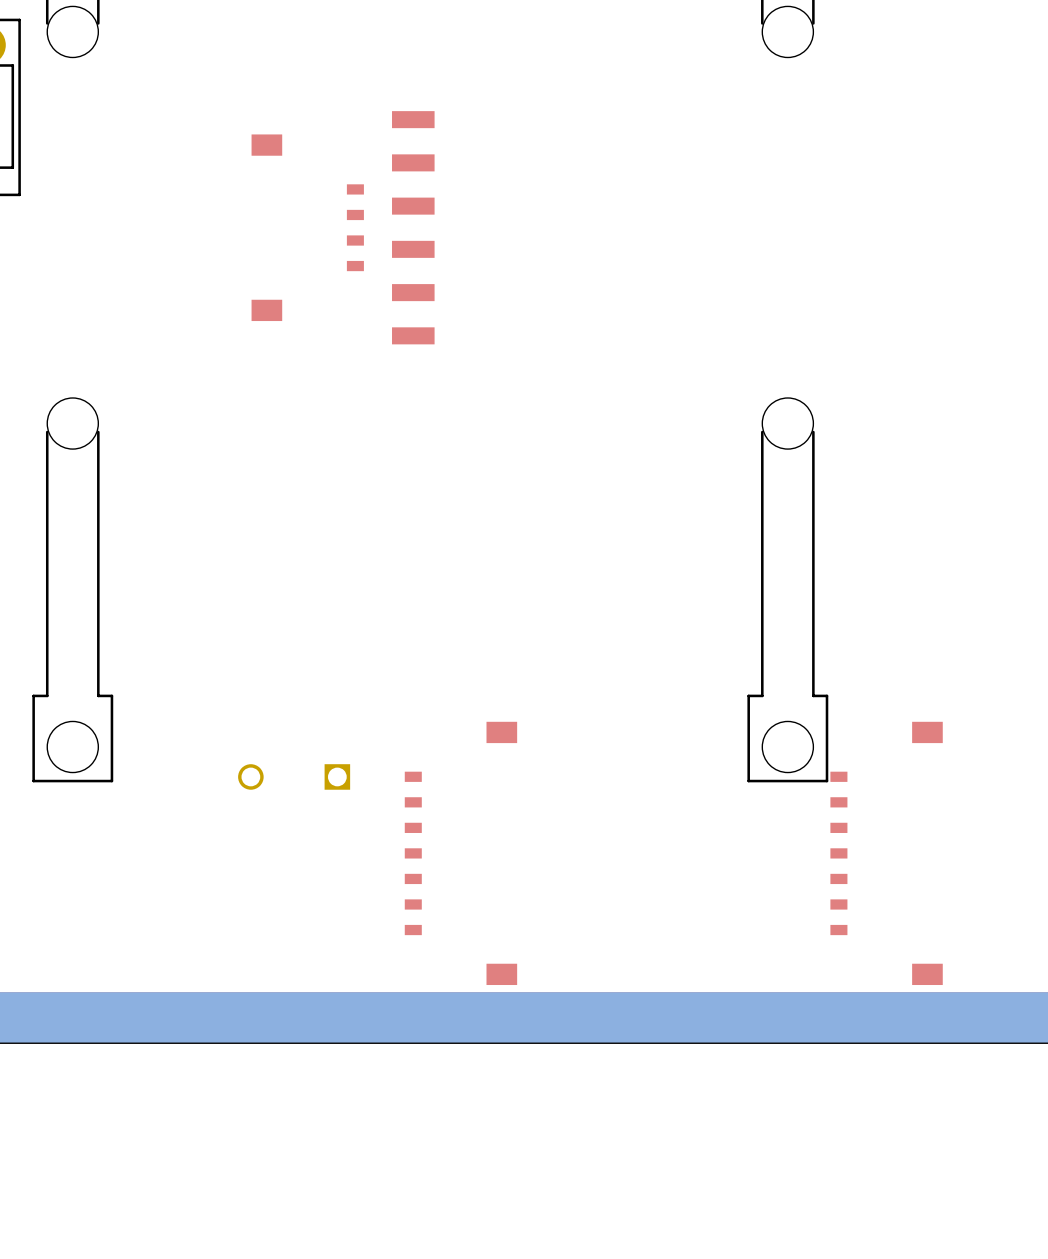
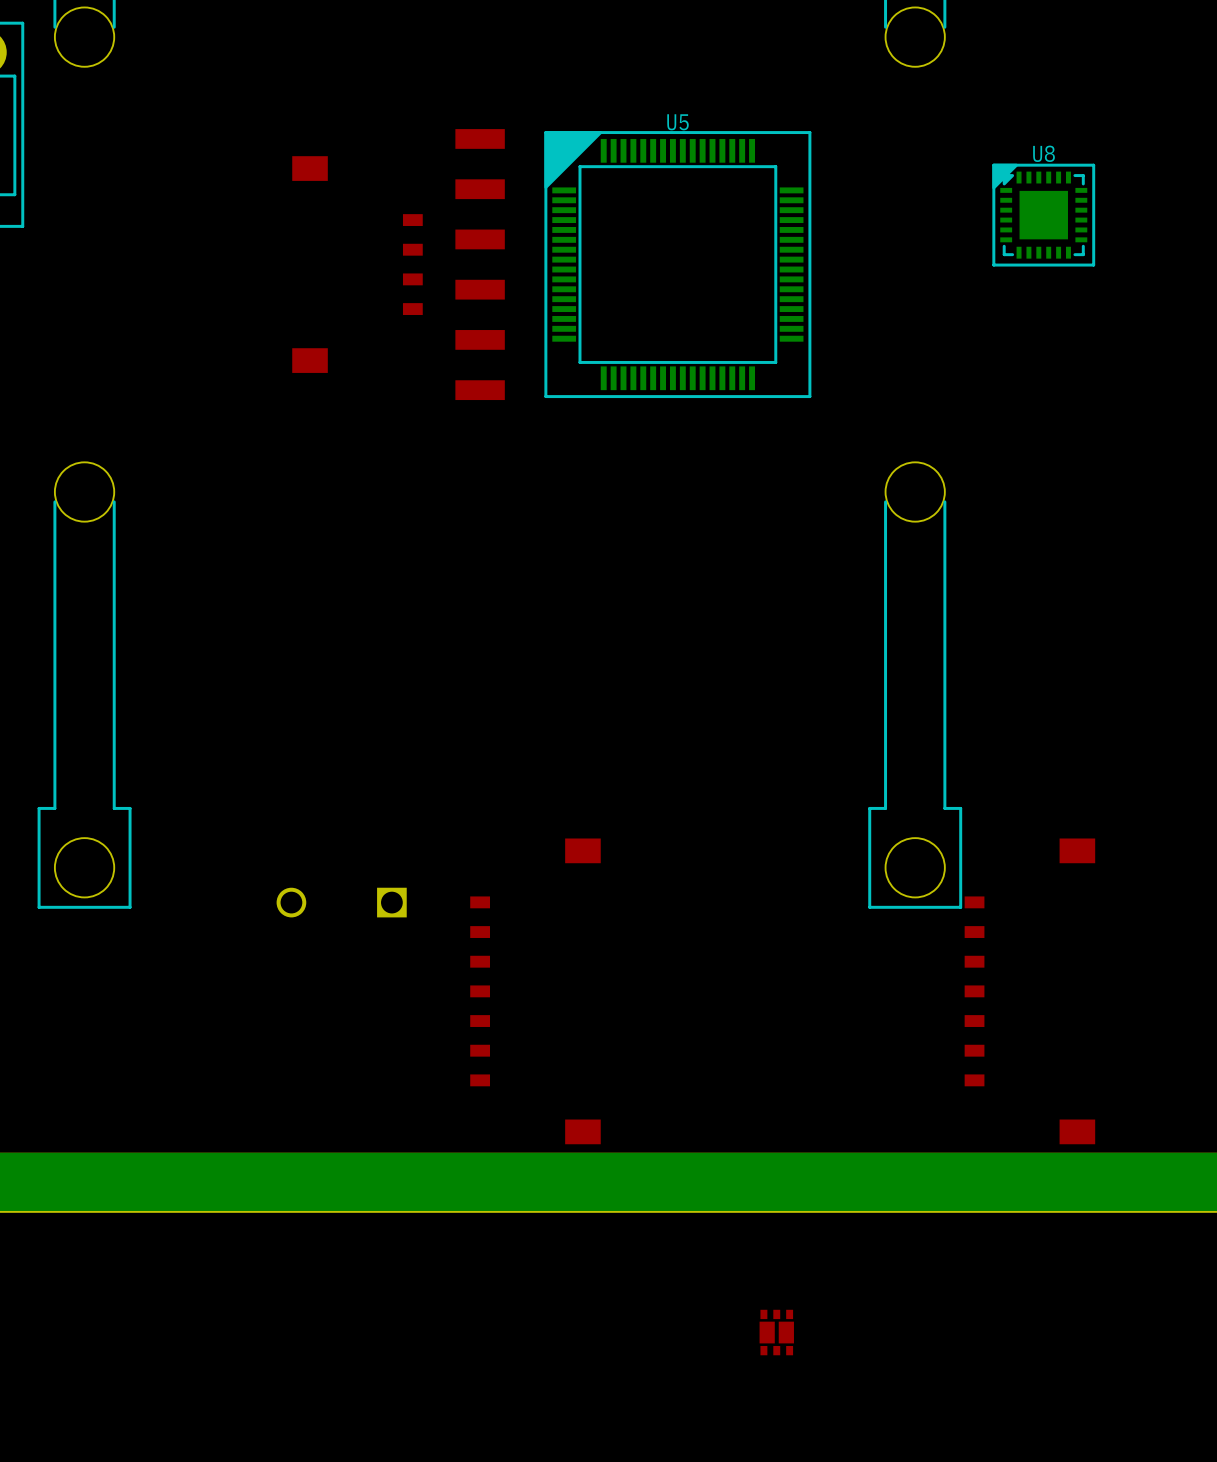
U8: none -> (1043, 215)
U5: none -> (677, 264)
part: none -> (776, 1332)

